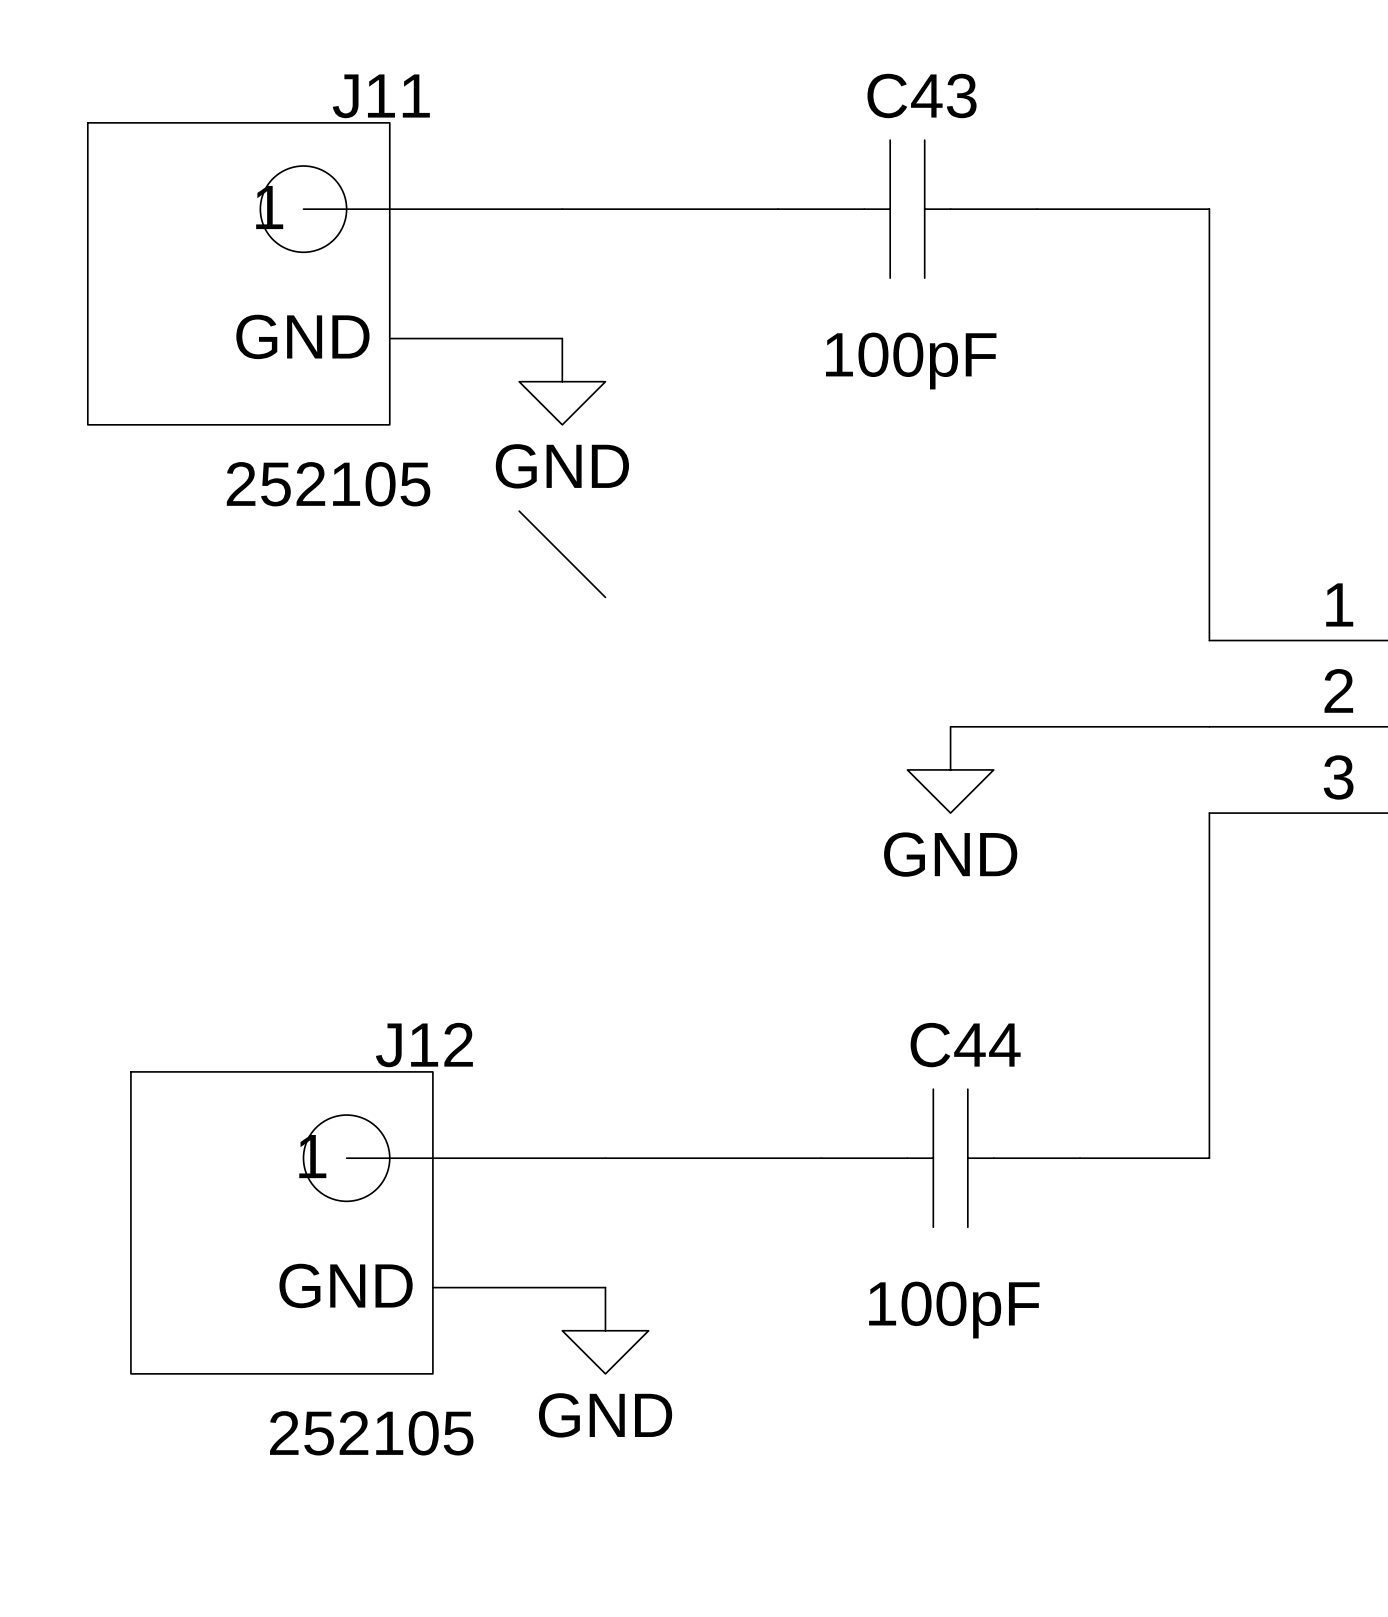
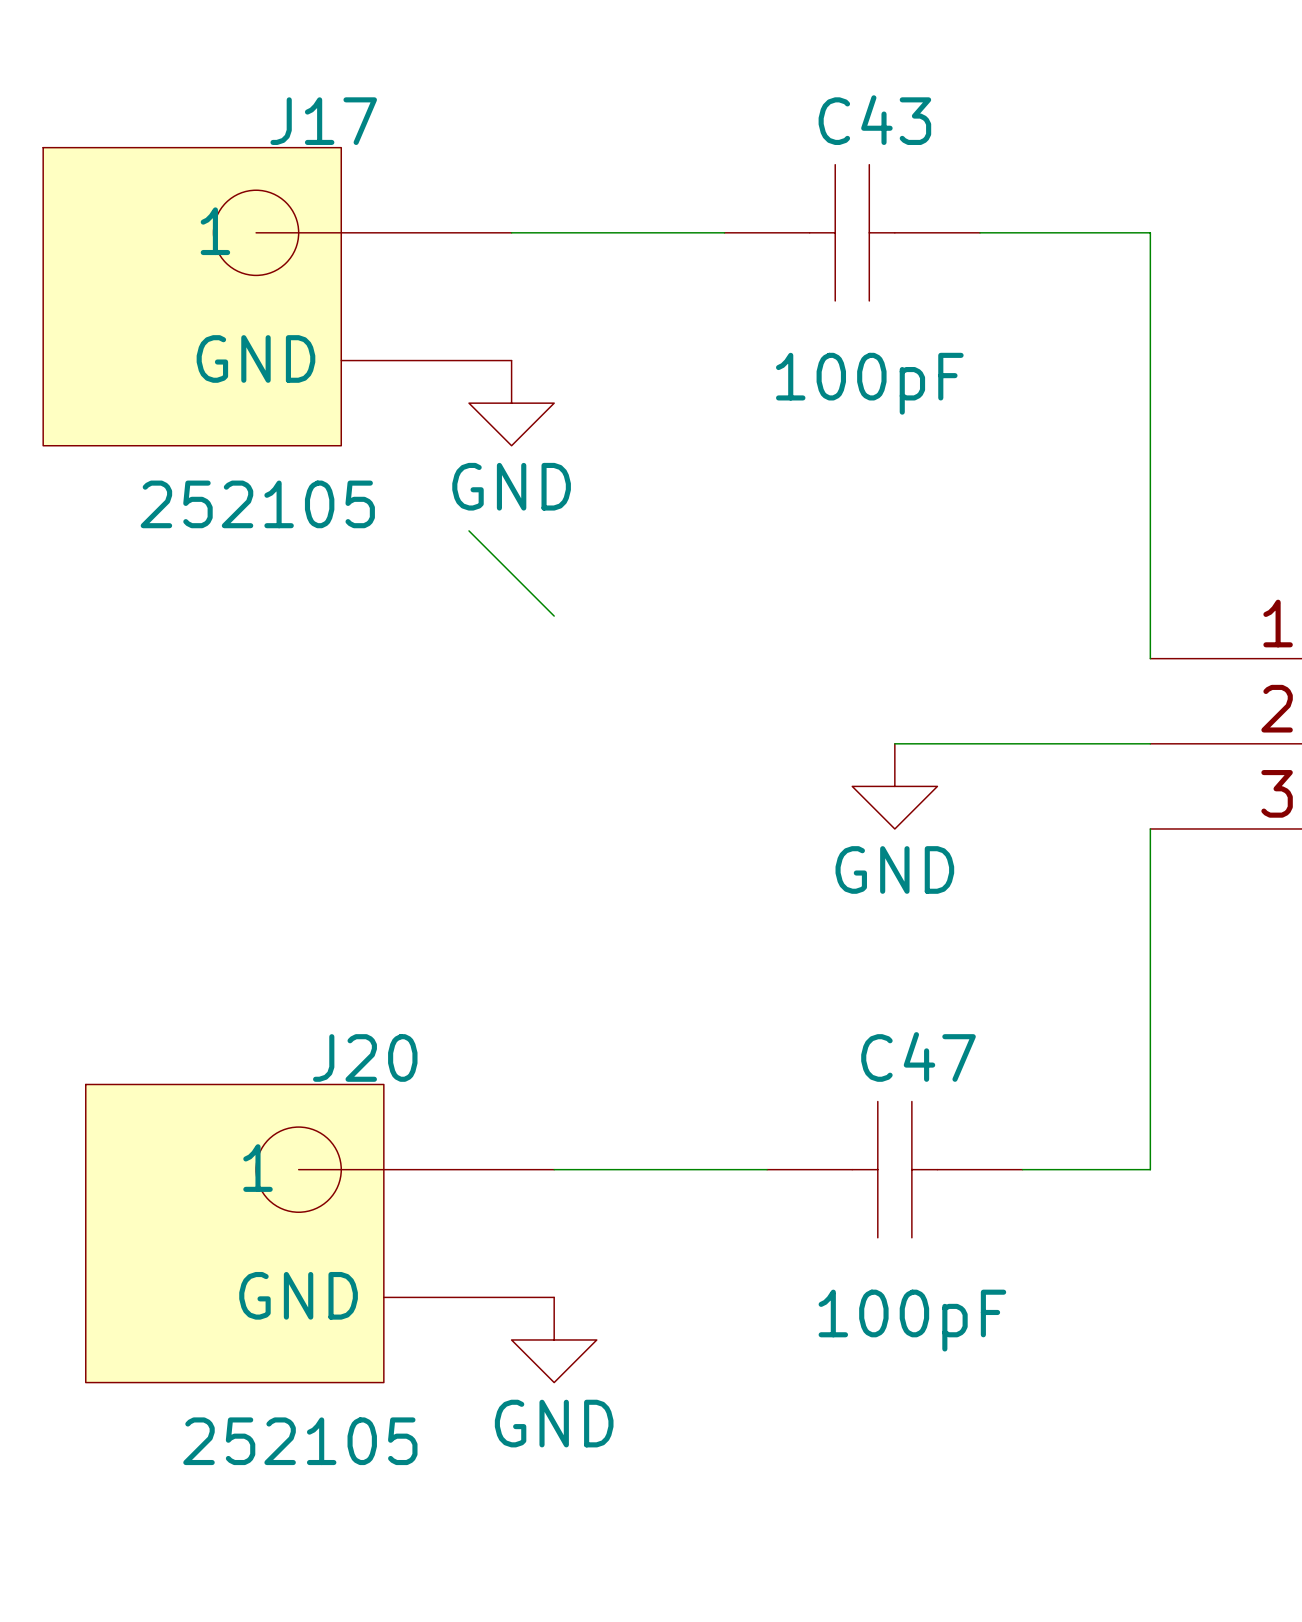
J11 name: J11 (381, 96) -> J17 (323, 121)
J12 name: J12 (424, 1045) -> J20 (365, 1057)
C44 name: C44 (965, 1045) -> C47 (918, 1056)

